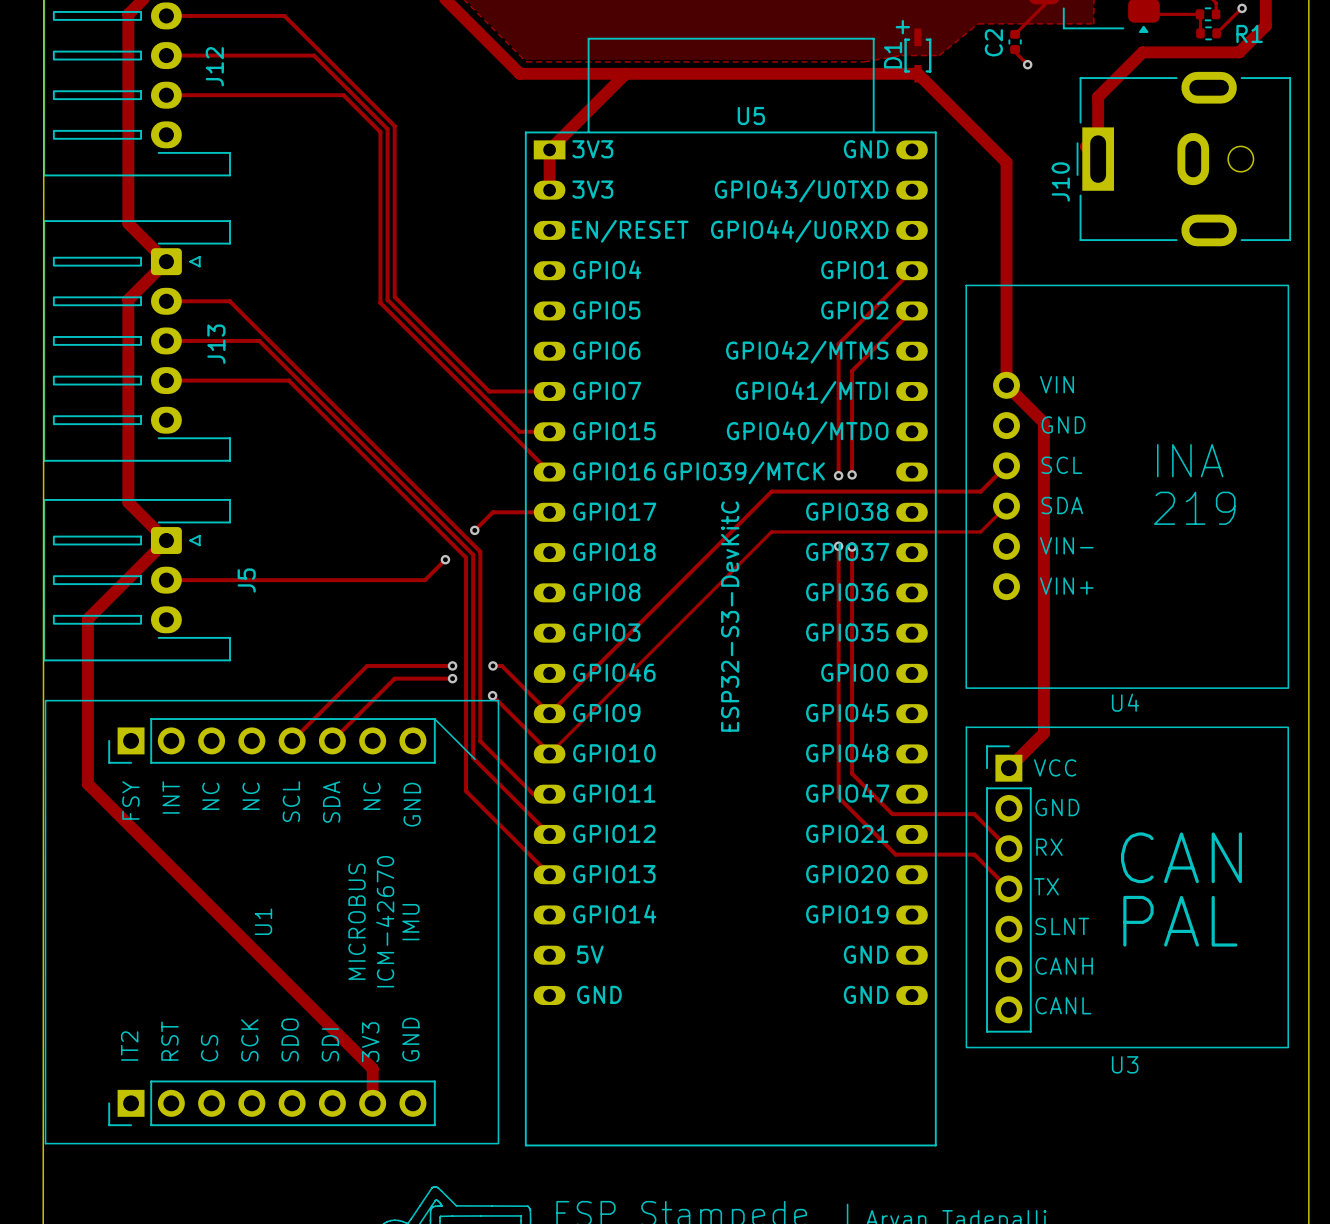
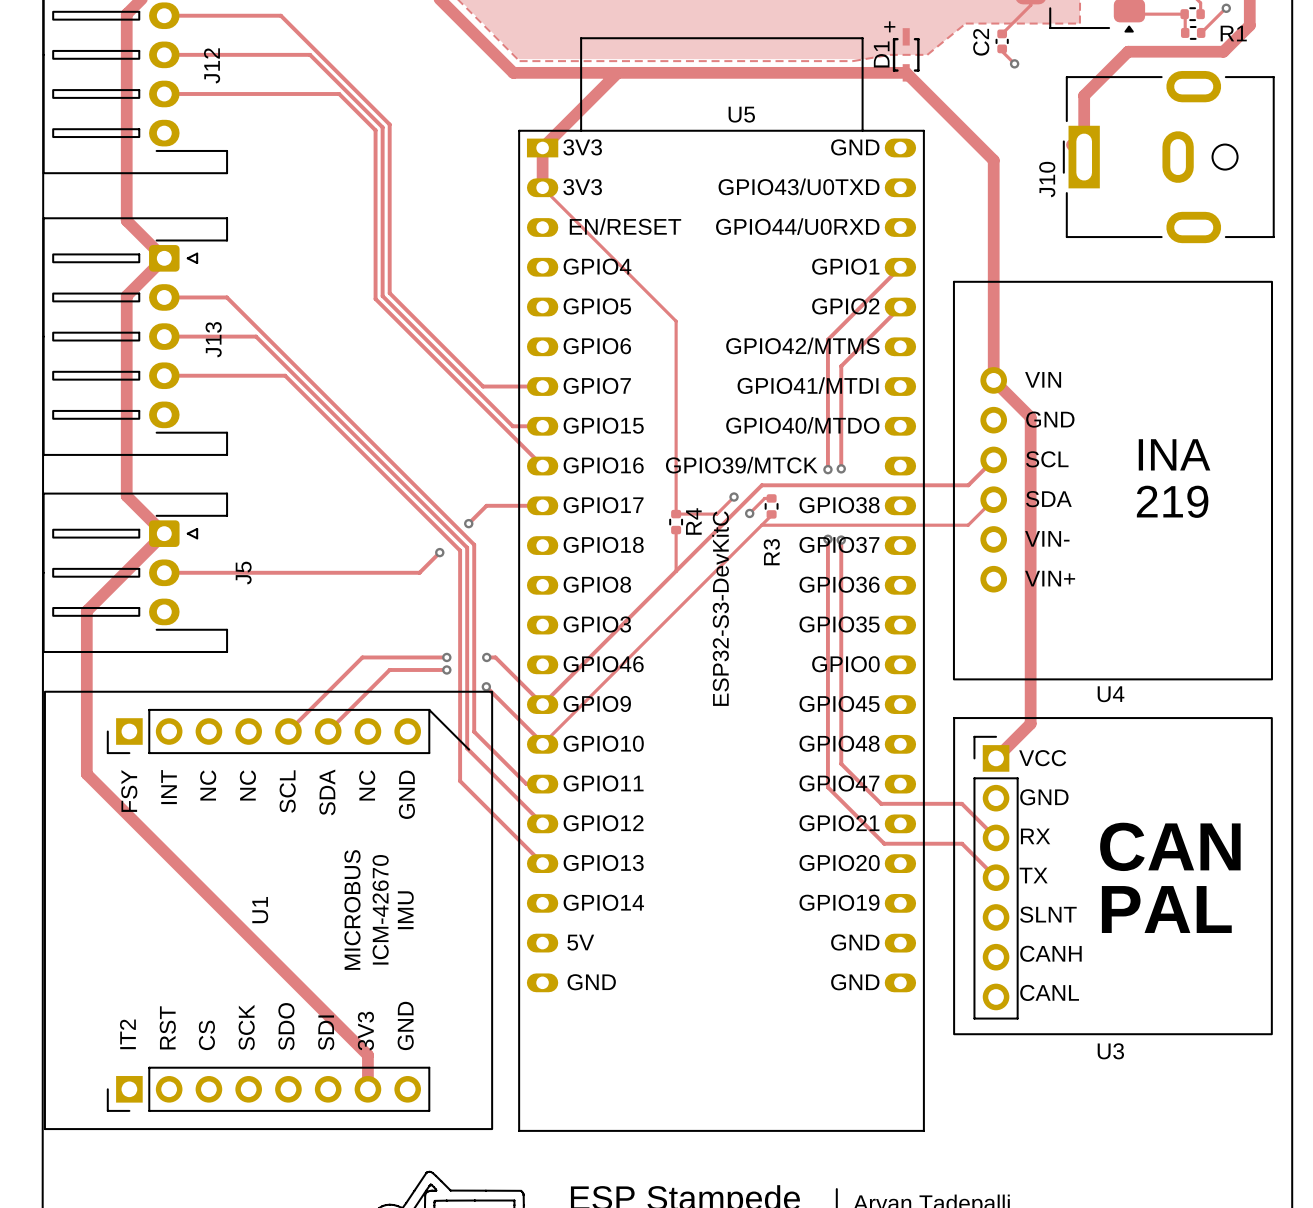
track: none -> (542, 187) (676, 321) (676, 514) (716, 514) (734, 497)
via: none -> (734, 497)
track: none -> (771, 498) (764, 498) (749, 513)
R3: none -> (771, 506)
via: none -> (749, 513)
track: none -> (771, 514) (761, 525)
R4: none -> (676, 522)
track: none -> (676, 530) (676, 571)

